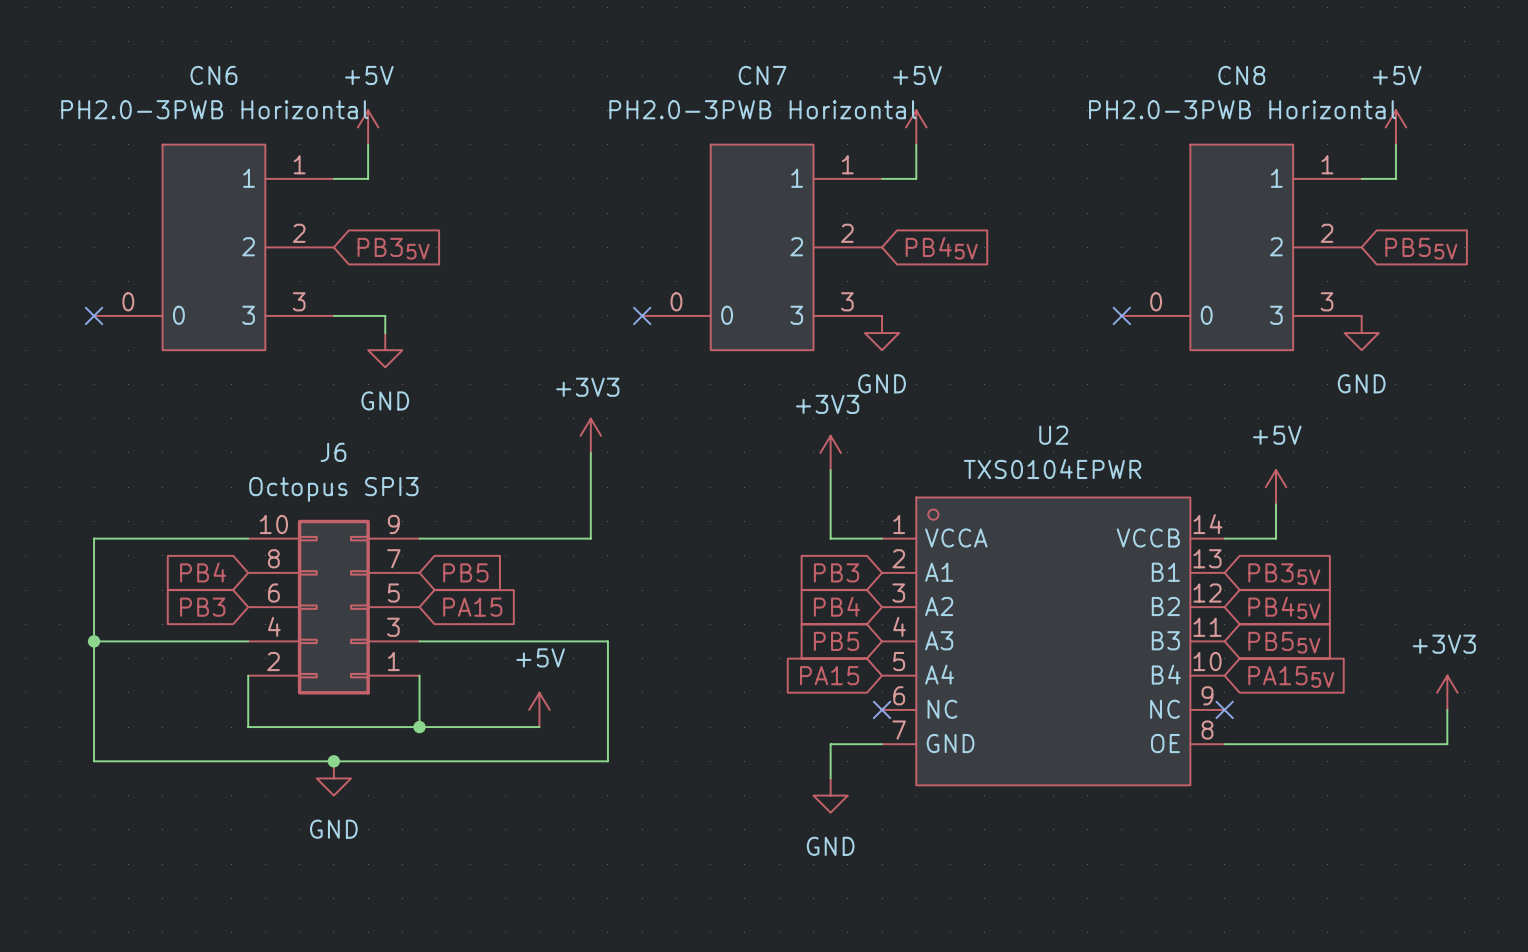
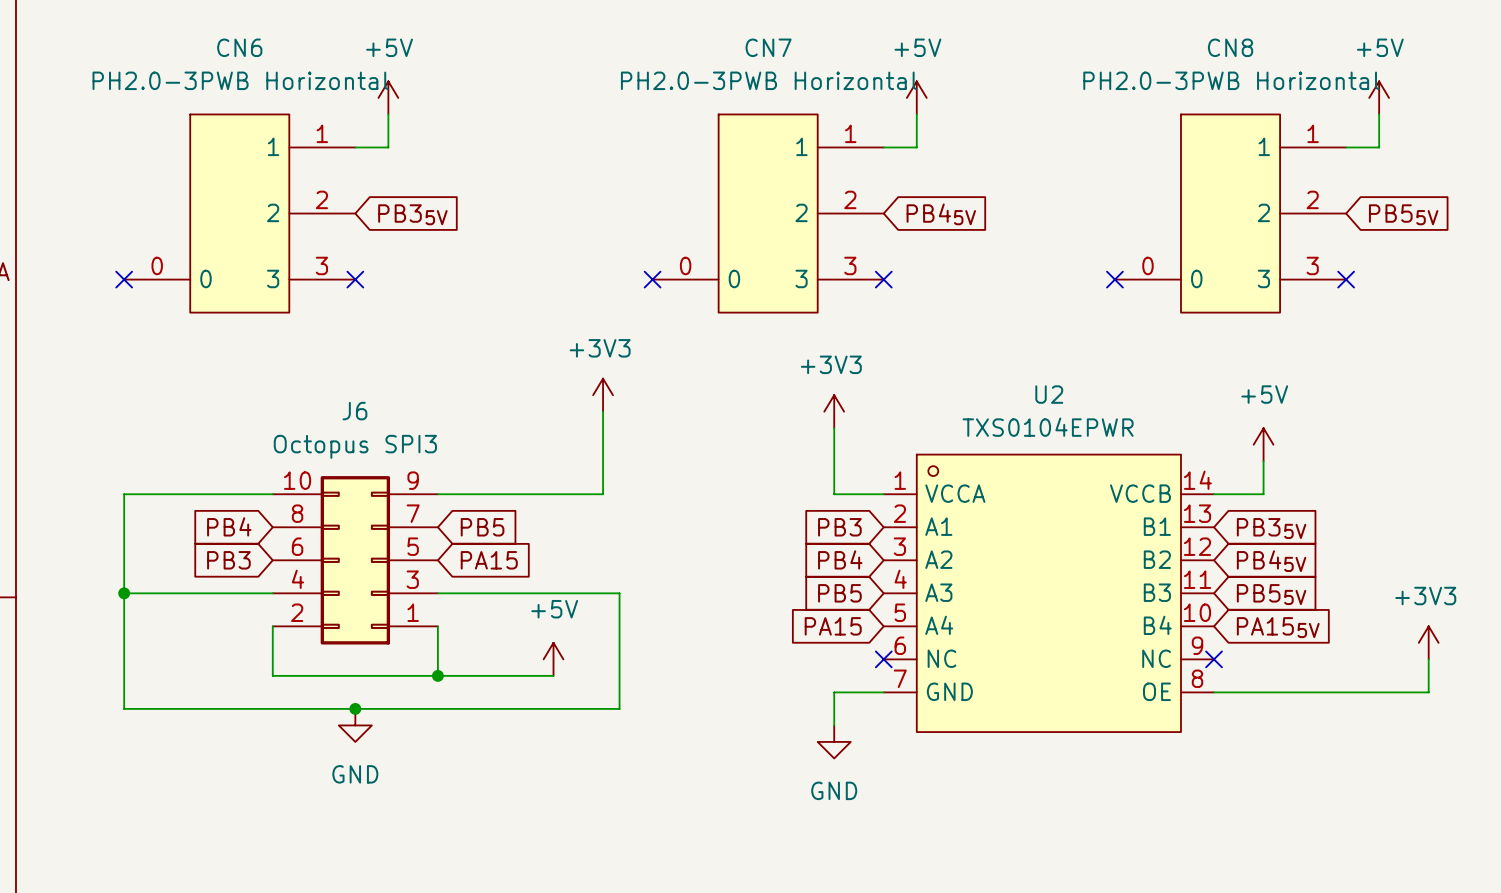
wire: (333, 315) (385, 315) (385, 333) -> none
no-connect mark: none -> (355, 279)
no-connect mark: none -> (883, 279)
no-connect mark: none -> (1346, 279)
power symbol: GND (882, 333) -> none
power symbol: GND (1361, 333) -> none
power symbol: GND (385, 350) -> none

